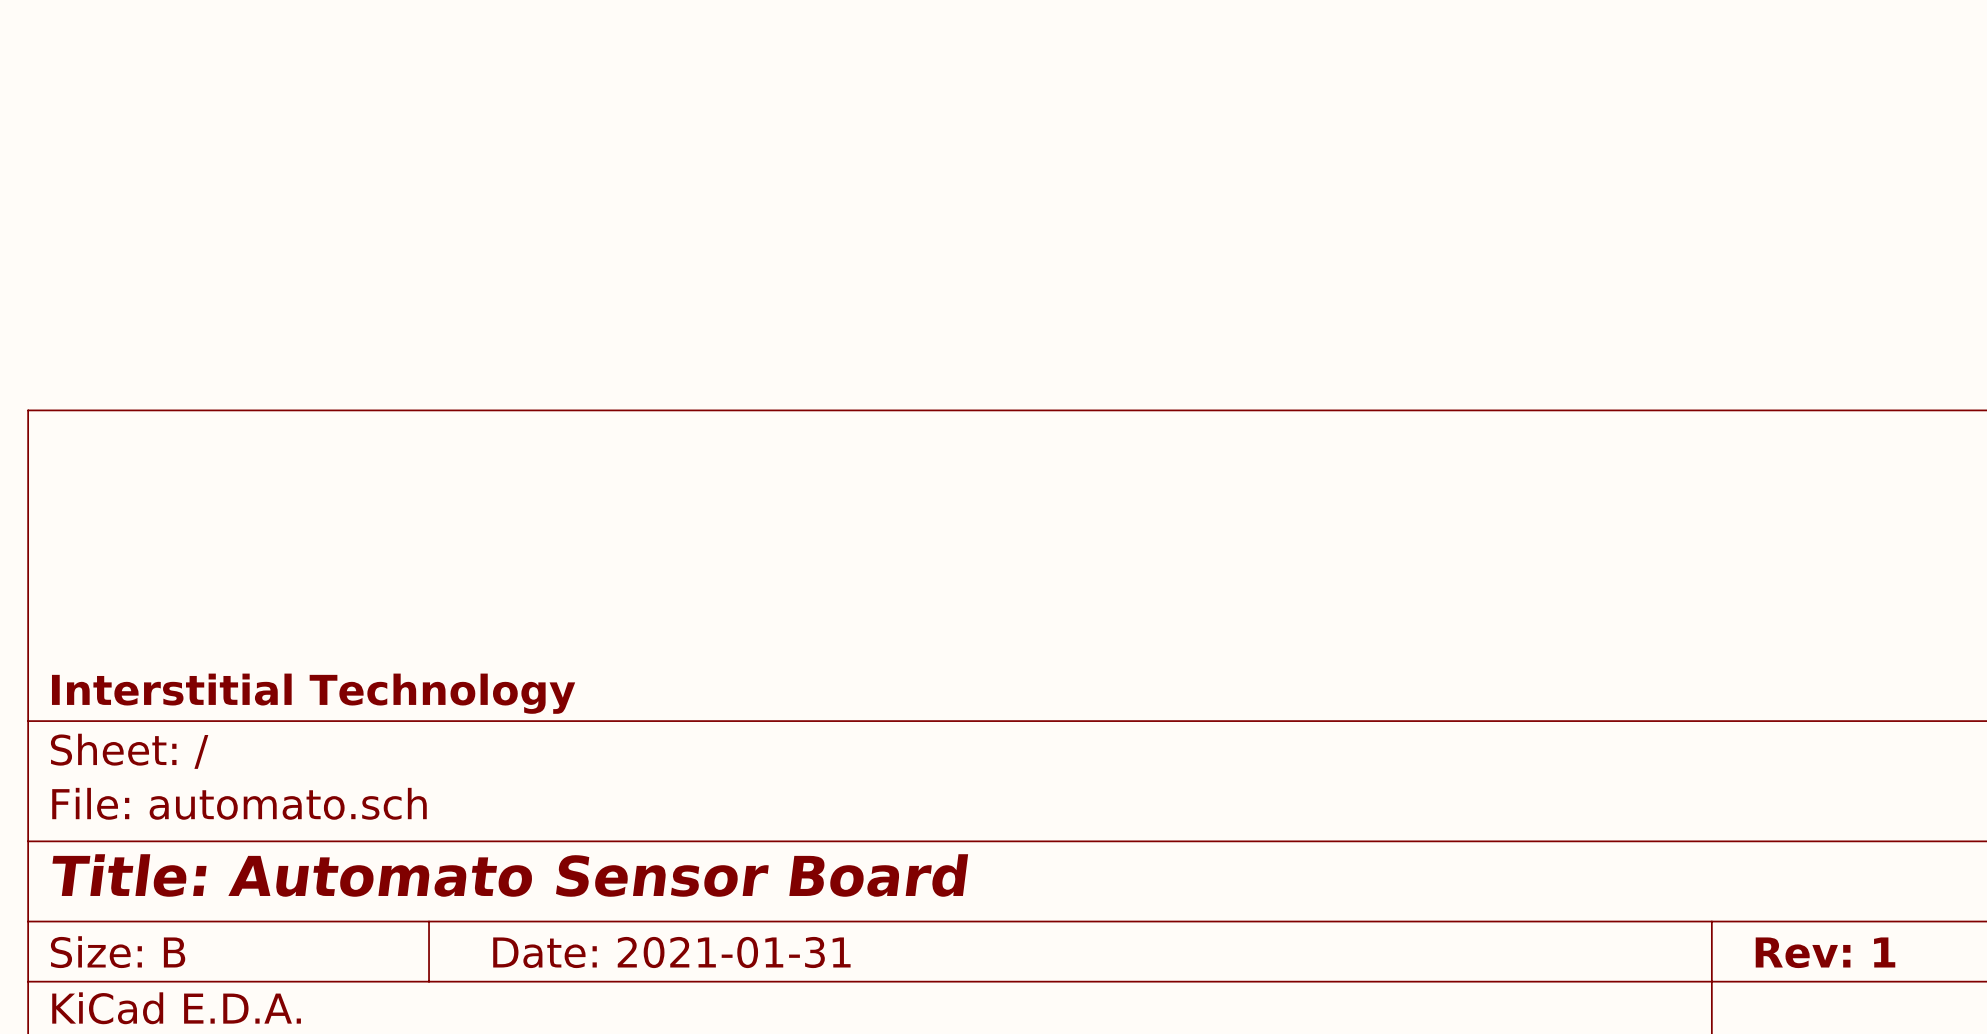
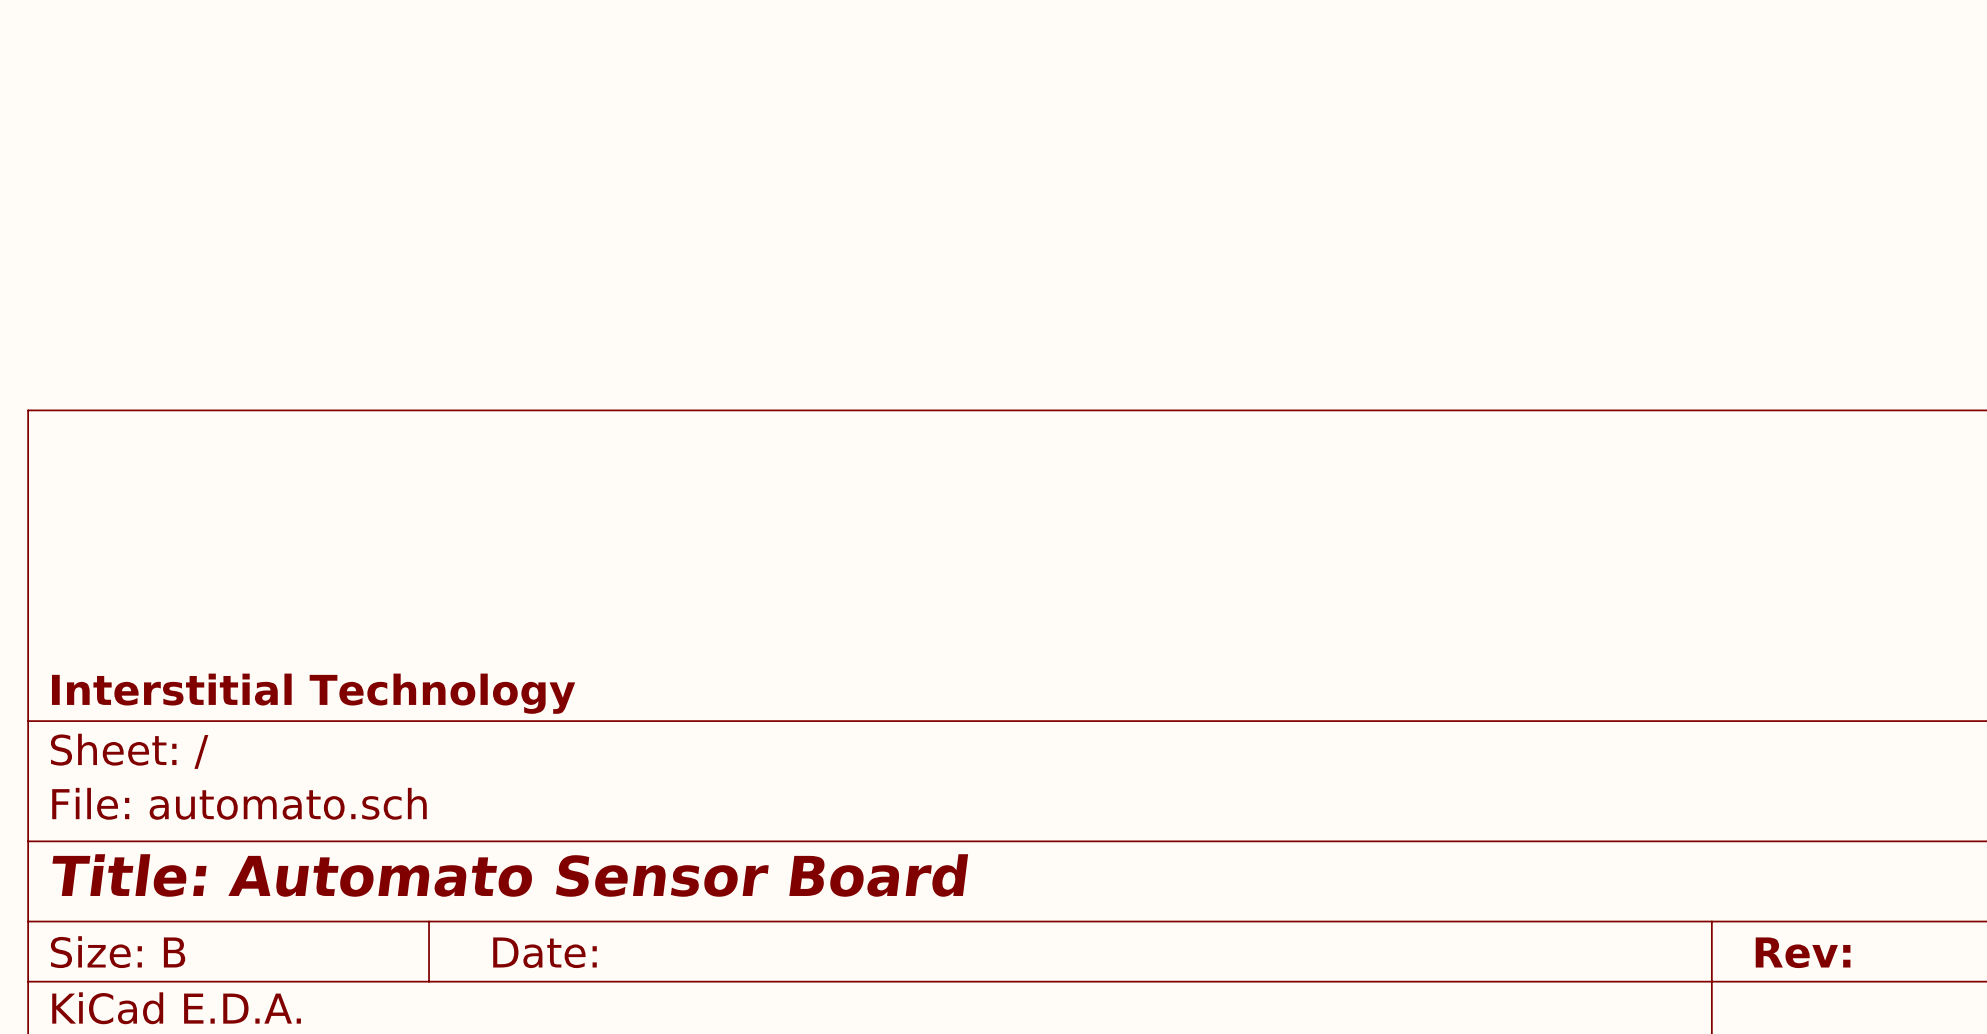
title block: Date: 2021-01-31 (671, 952) -> Date: (545, 952)
title block: Rev: 1 (1825, 952) -> Rev: (1803, 952)

